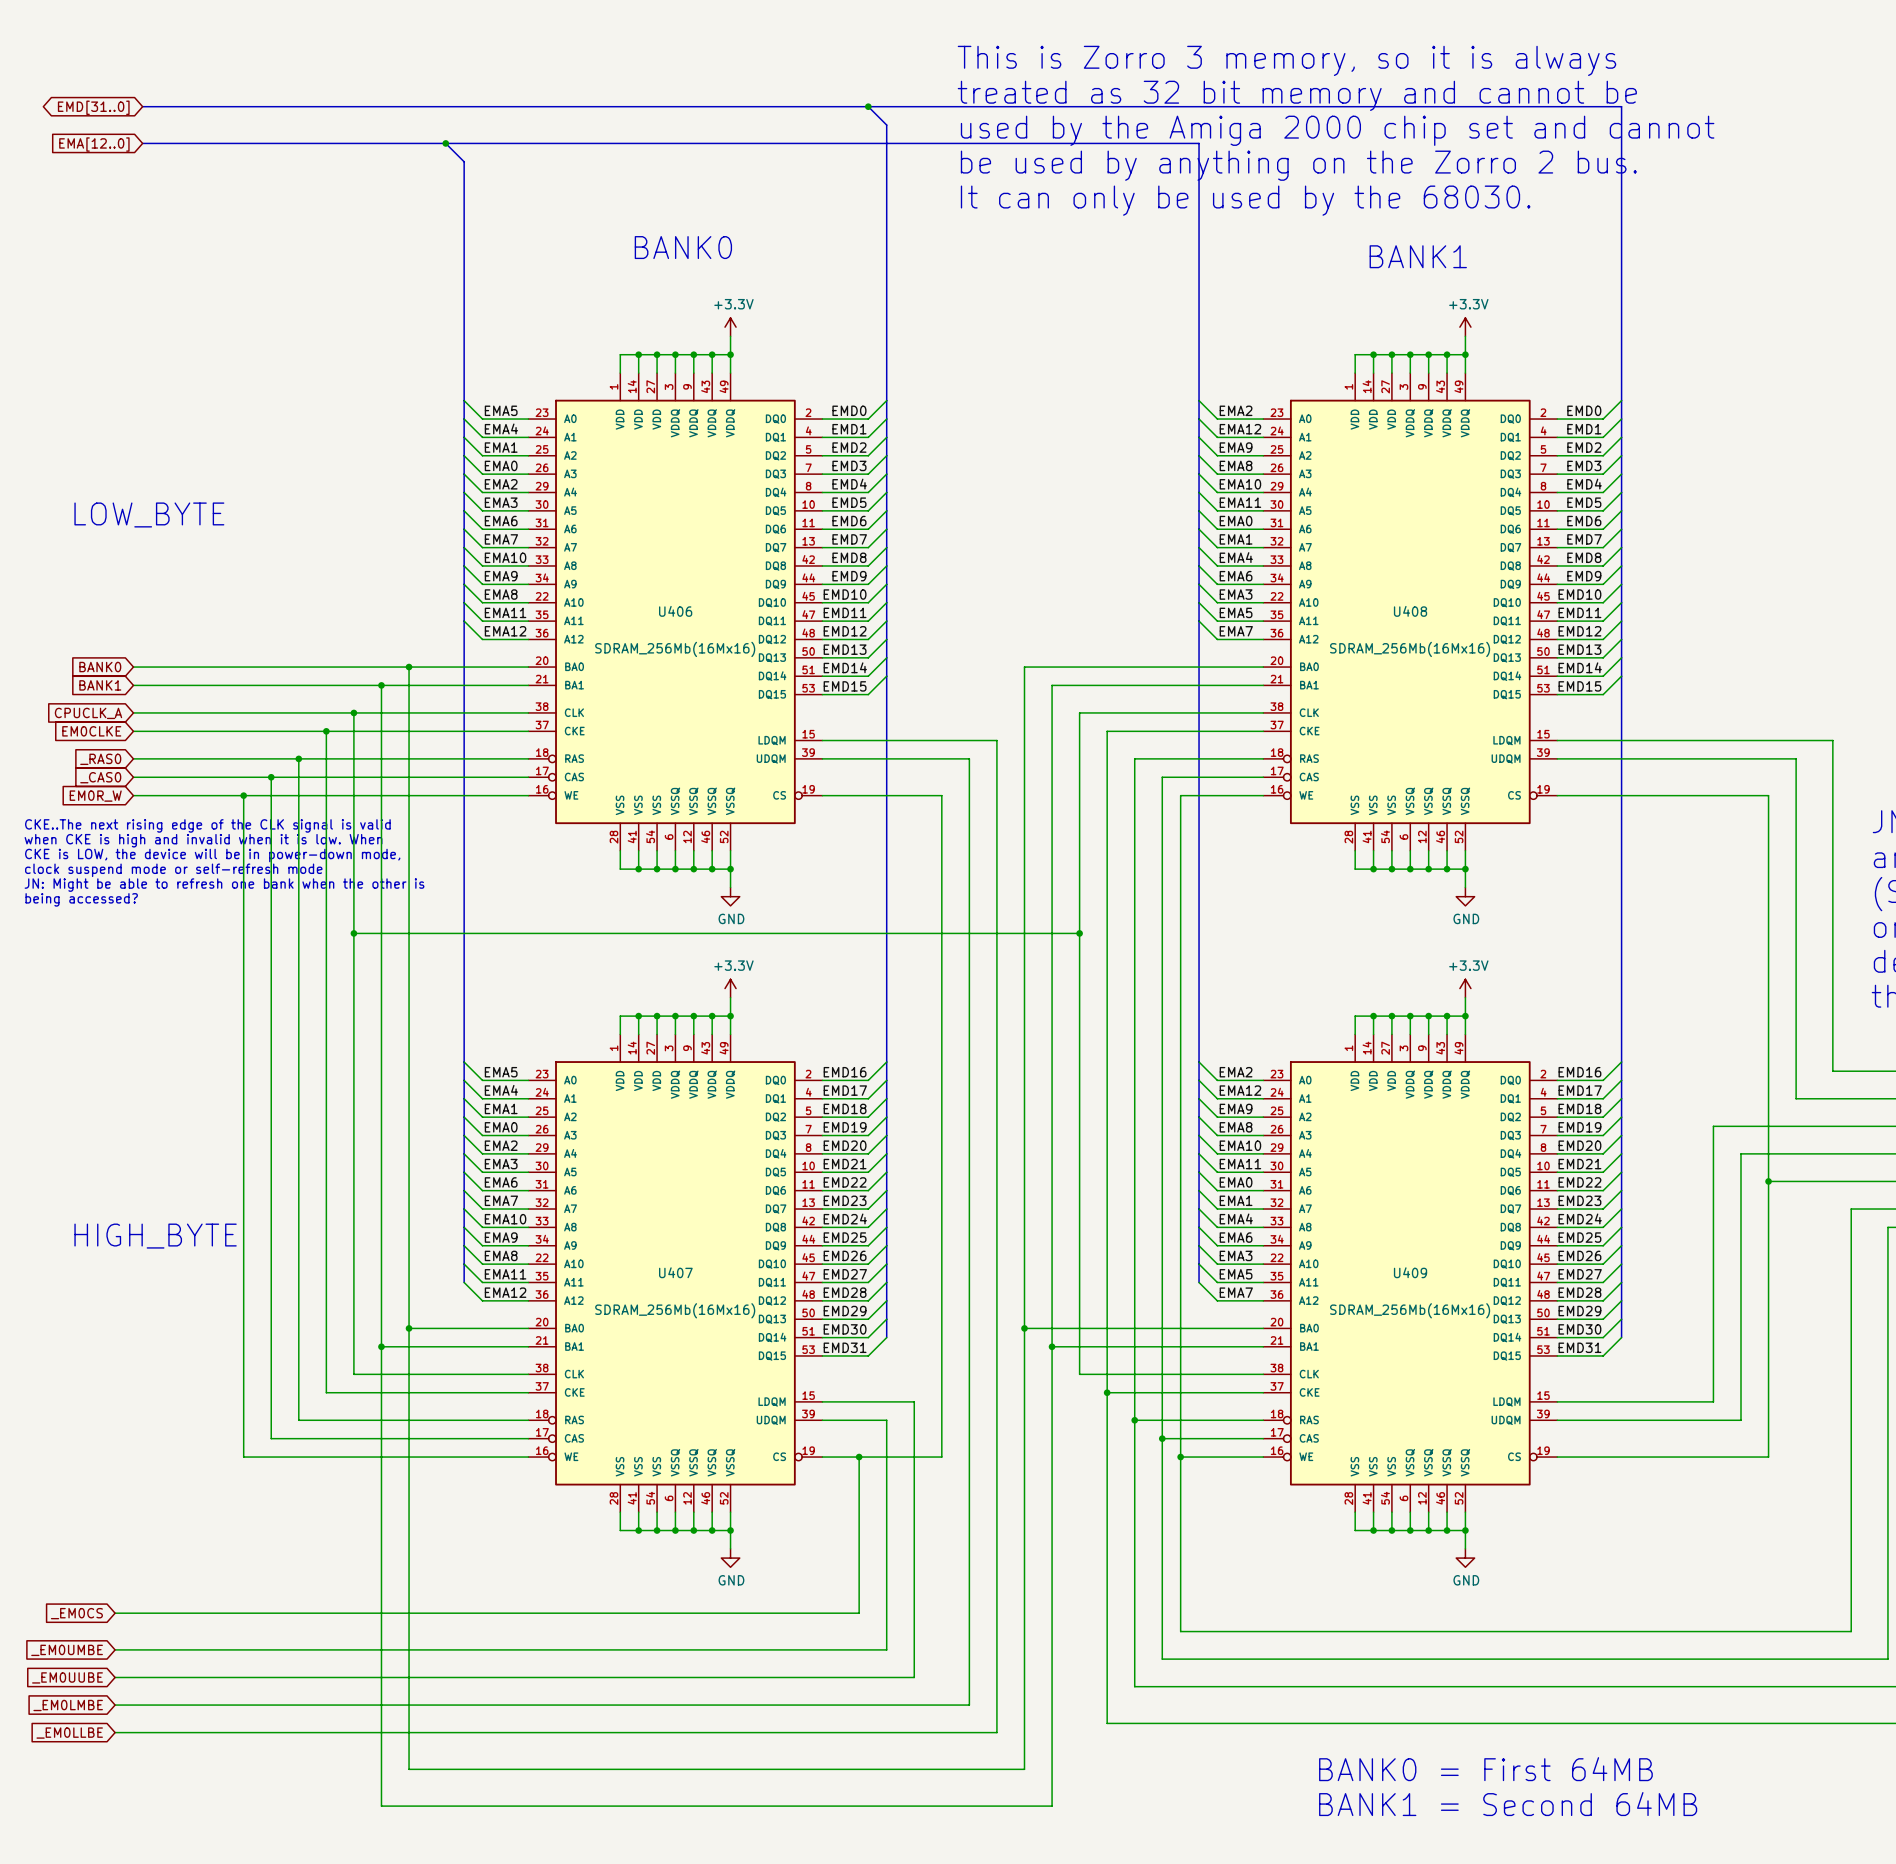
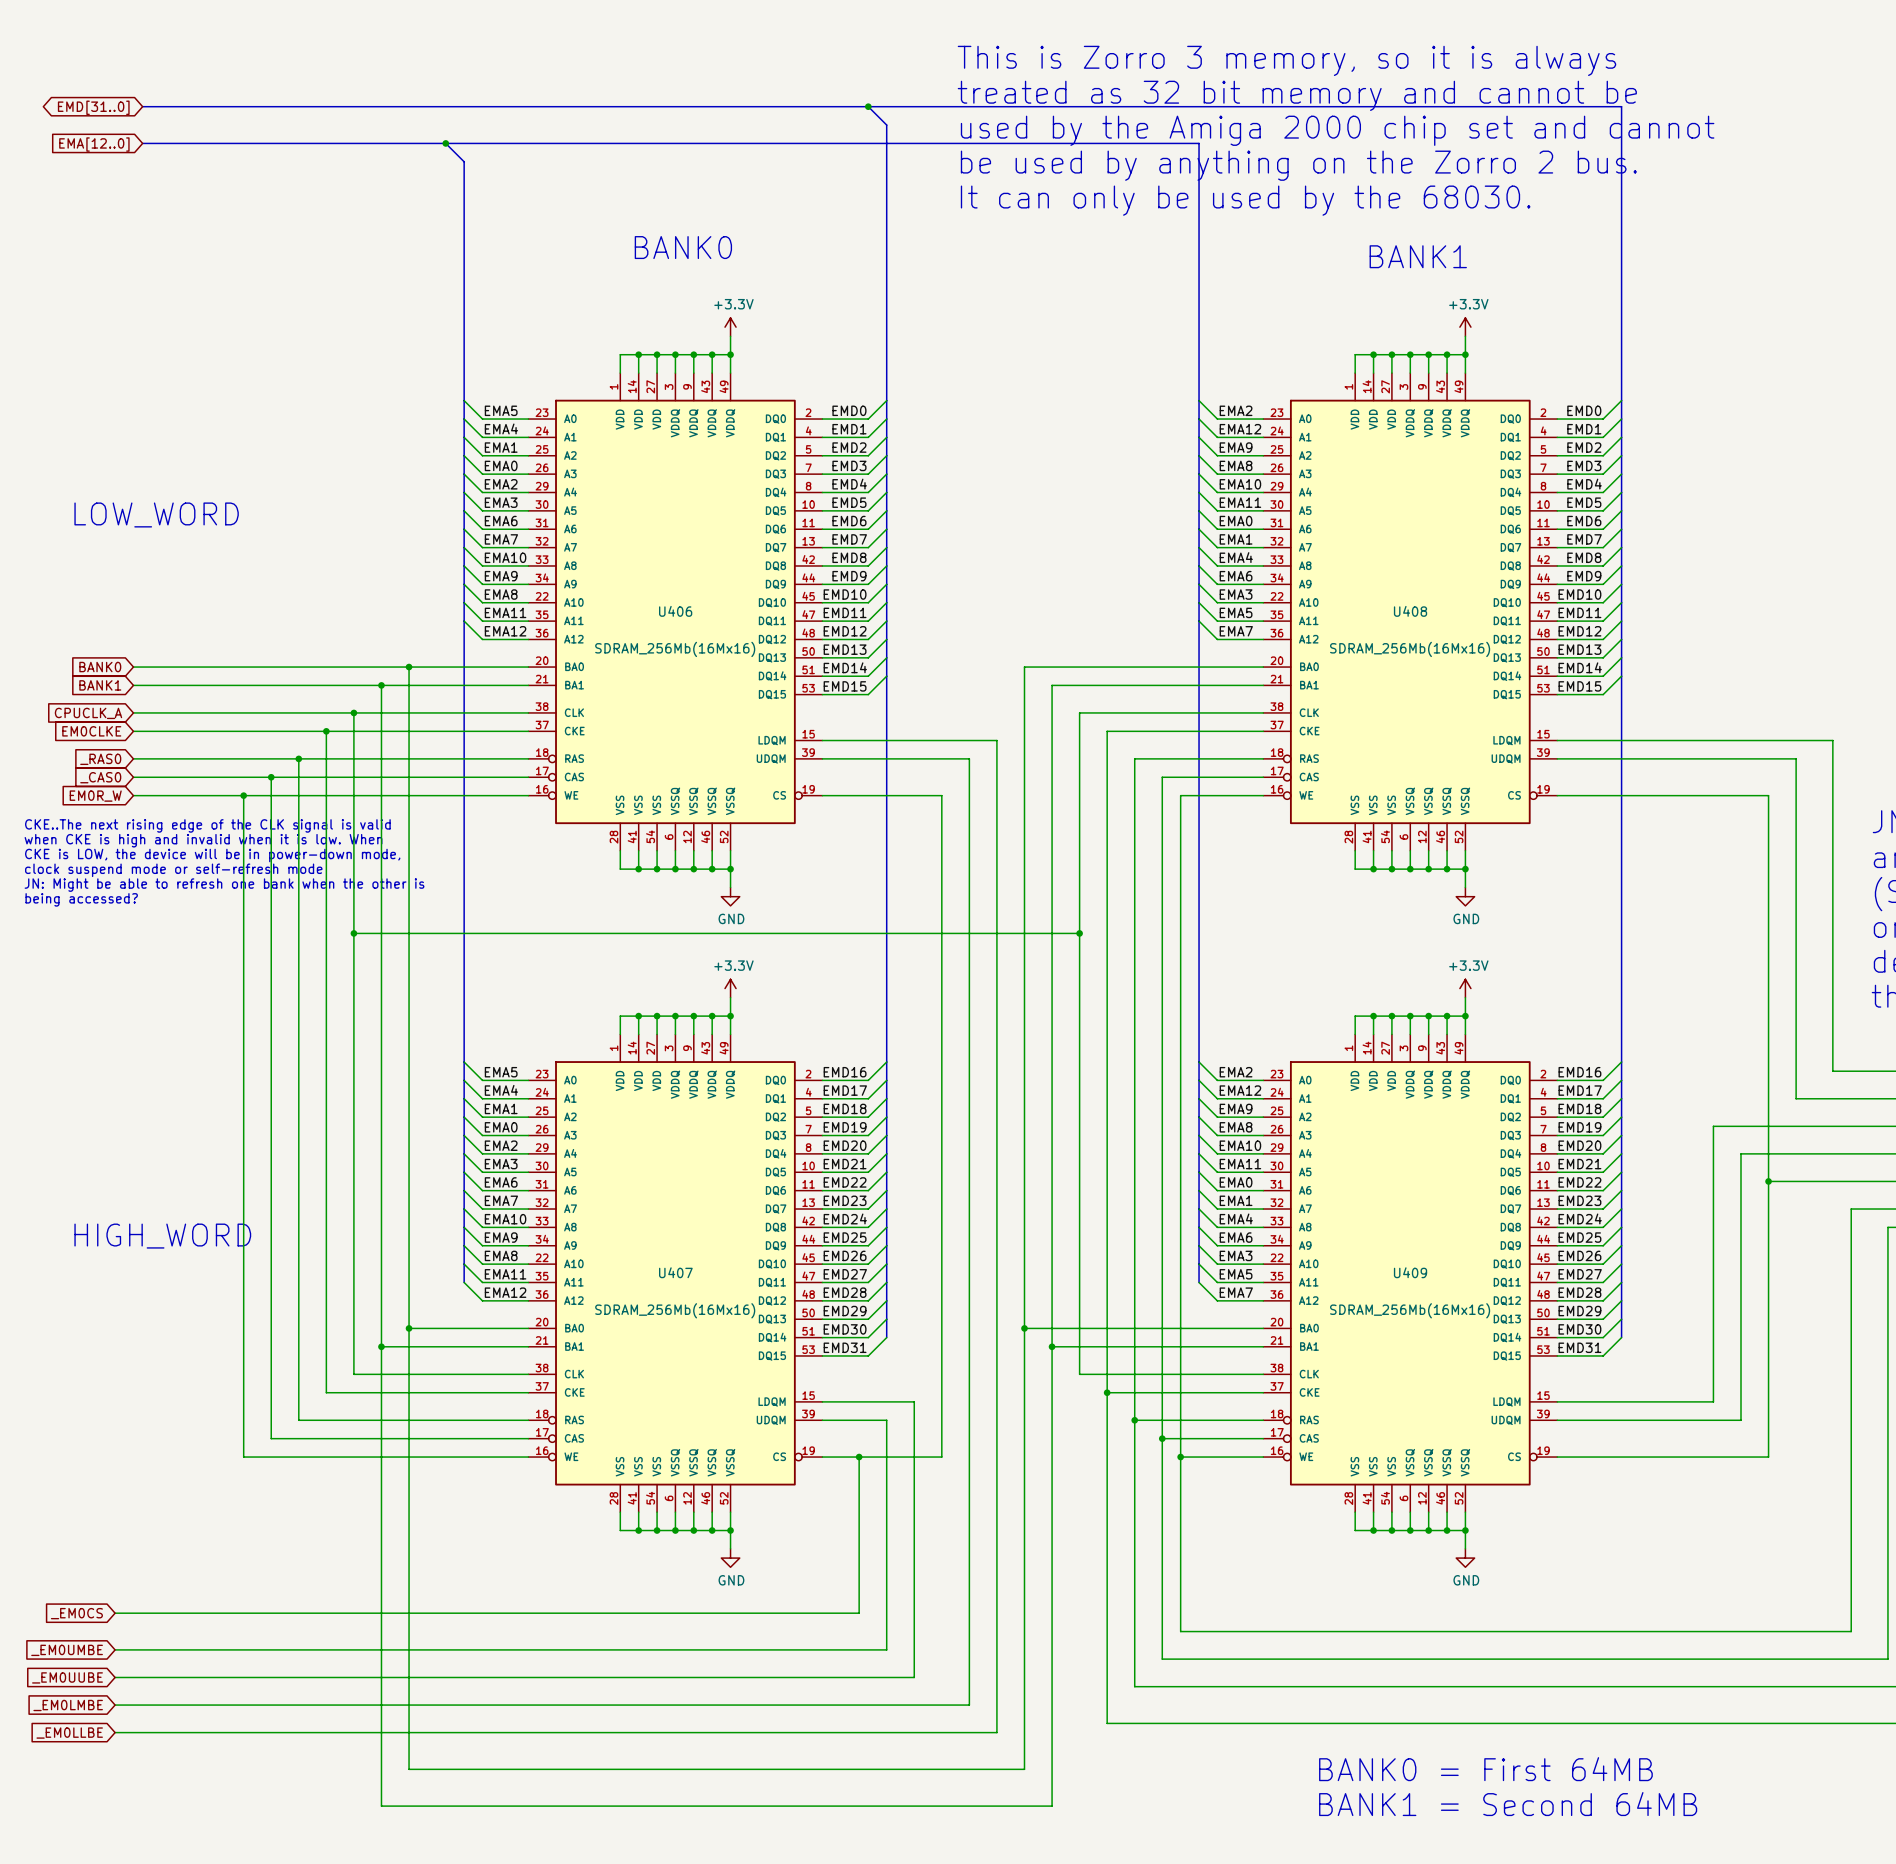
text: LOW_BYTE (149, 514) -> LOW_WORD (156, 514)
text: HIGH_BYTE (155, 1236) -> HIGH_WORD (162, 1236)

